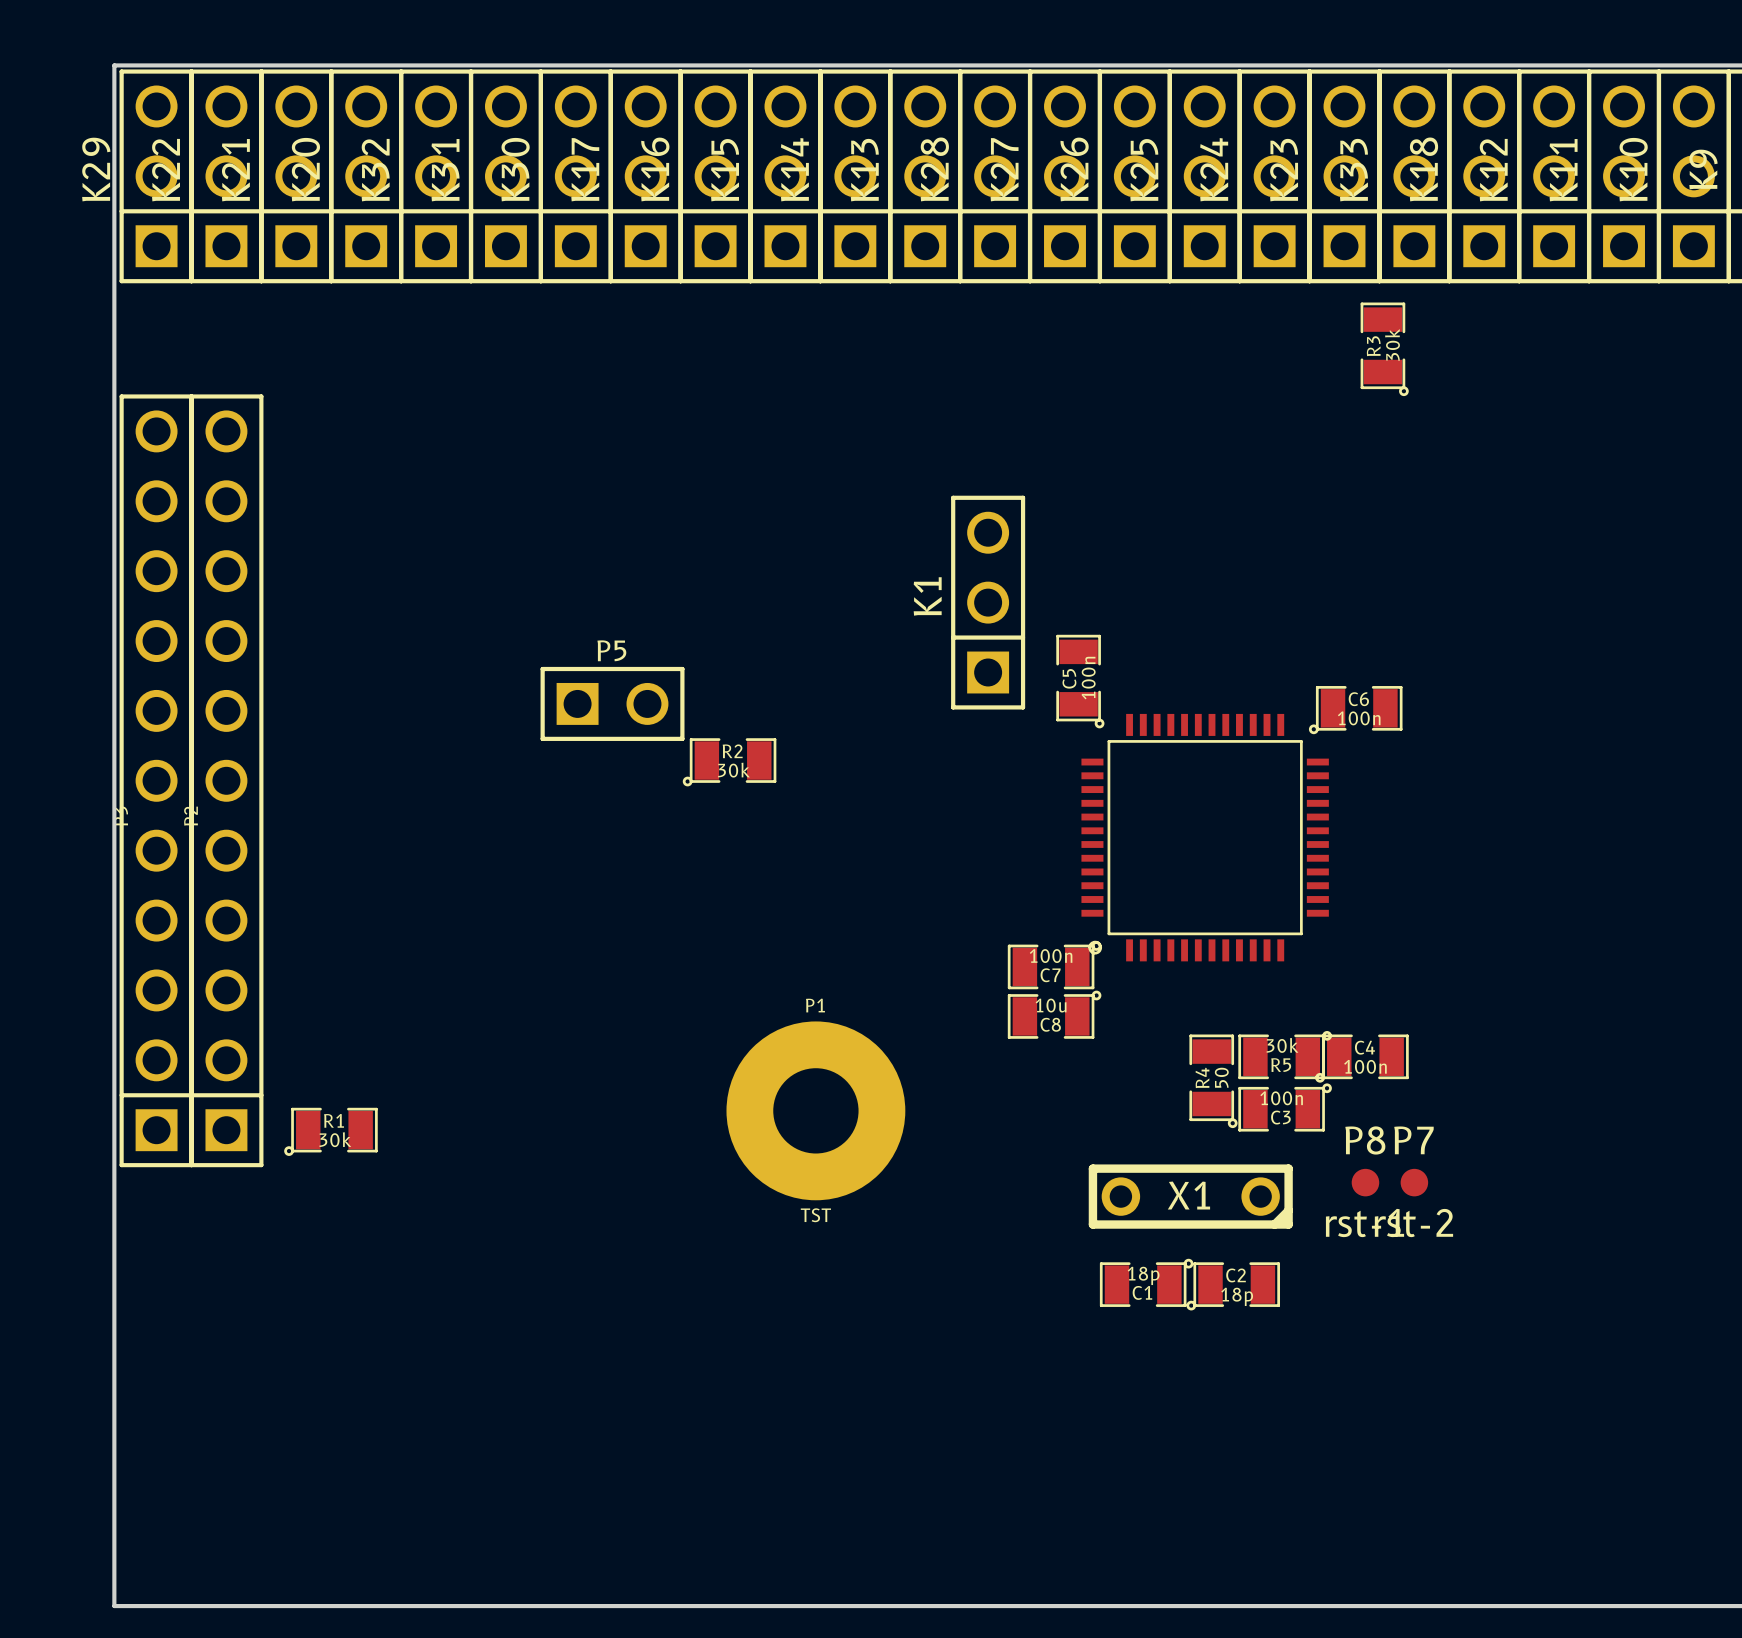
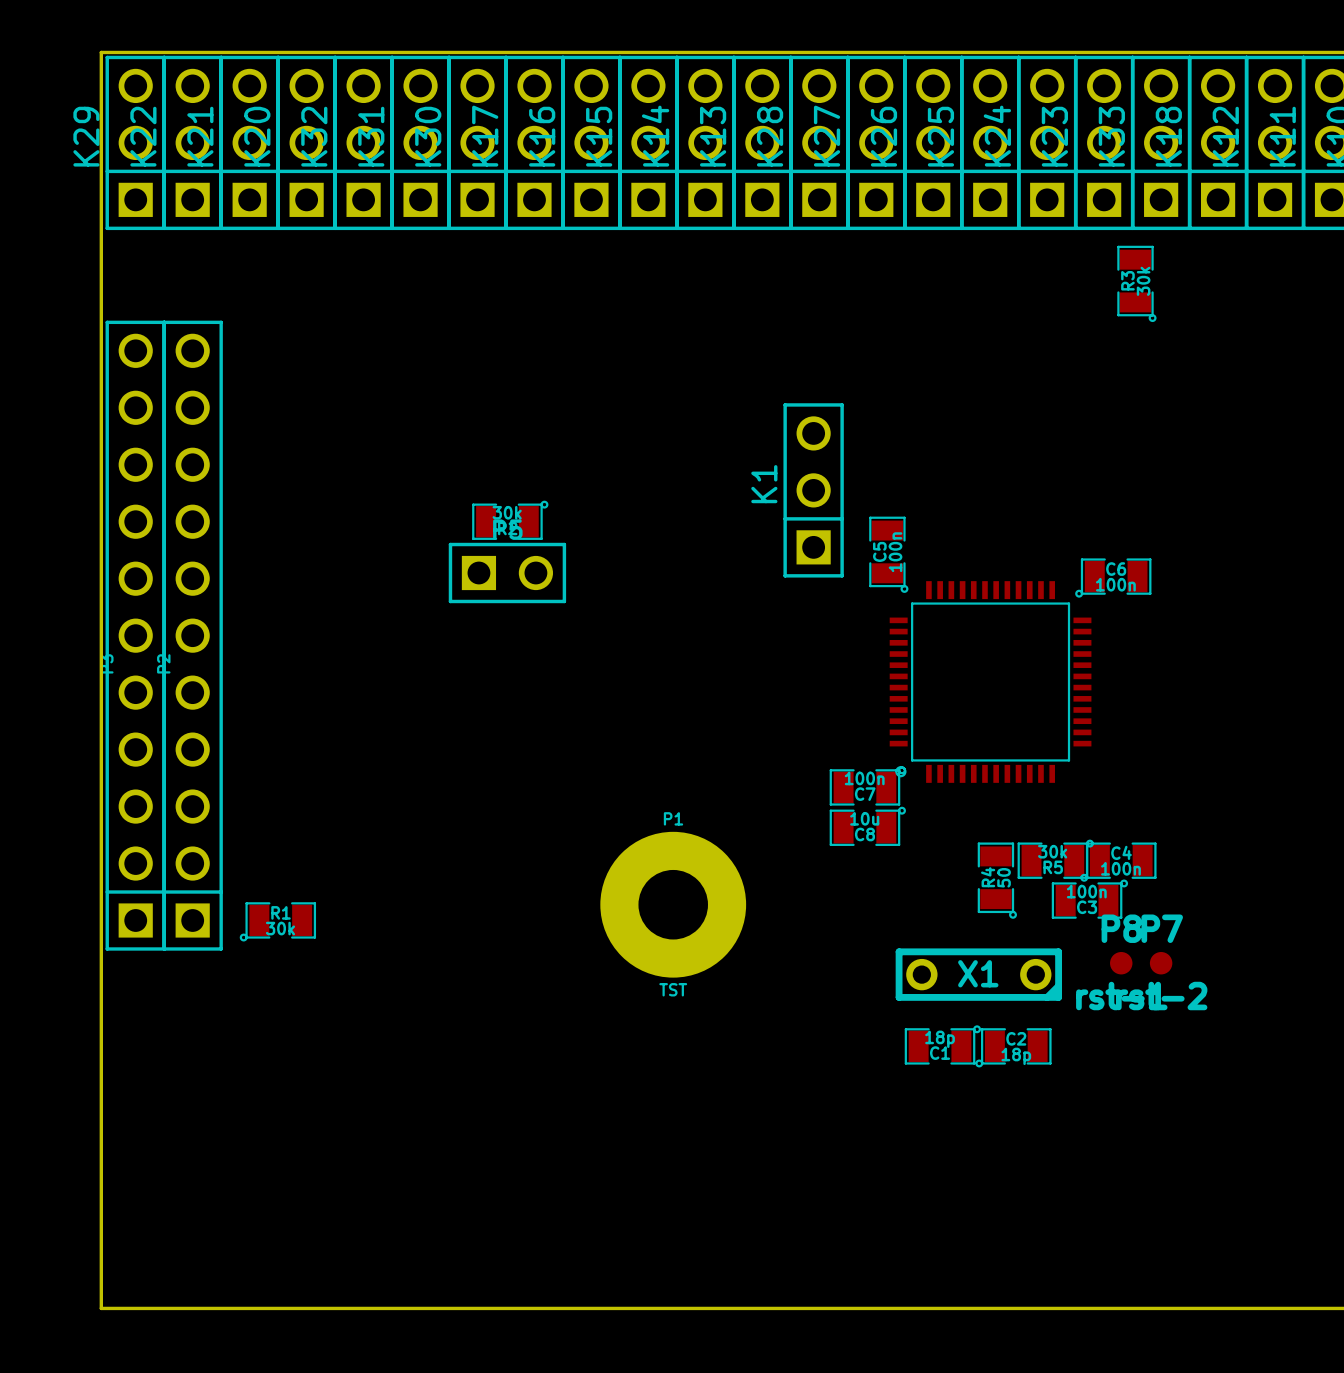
R2 rotation: 0° (729, 762) -> 180° (510, 520)
R2 position: (729, 762) -> (510, 520)
C3 position: (1285, 1107) -> (1089, 899)

